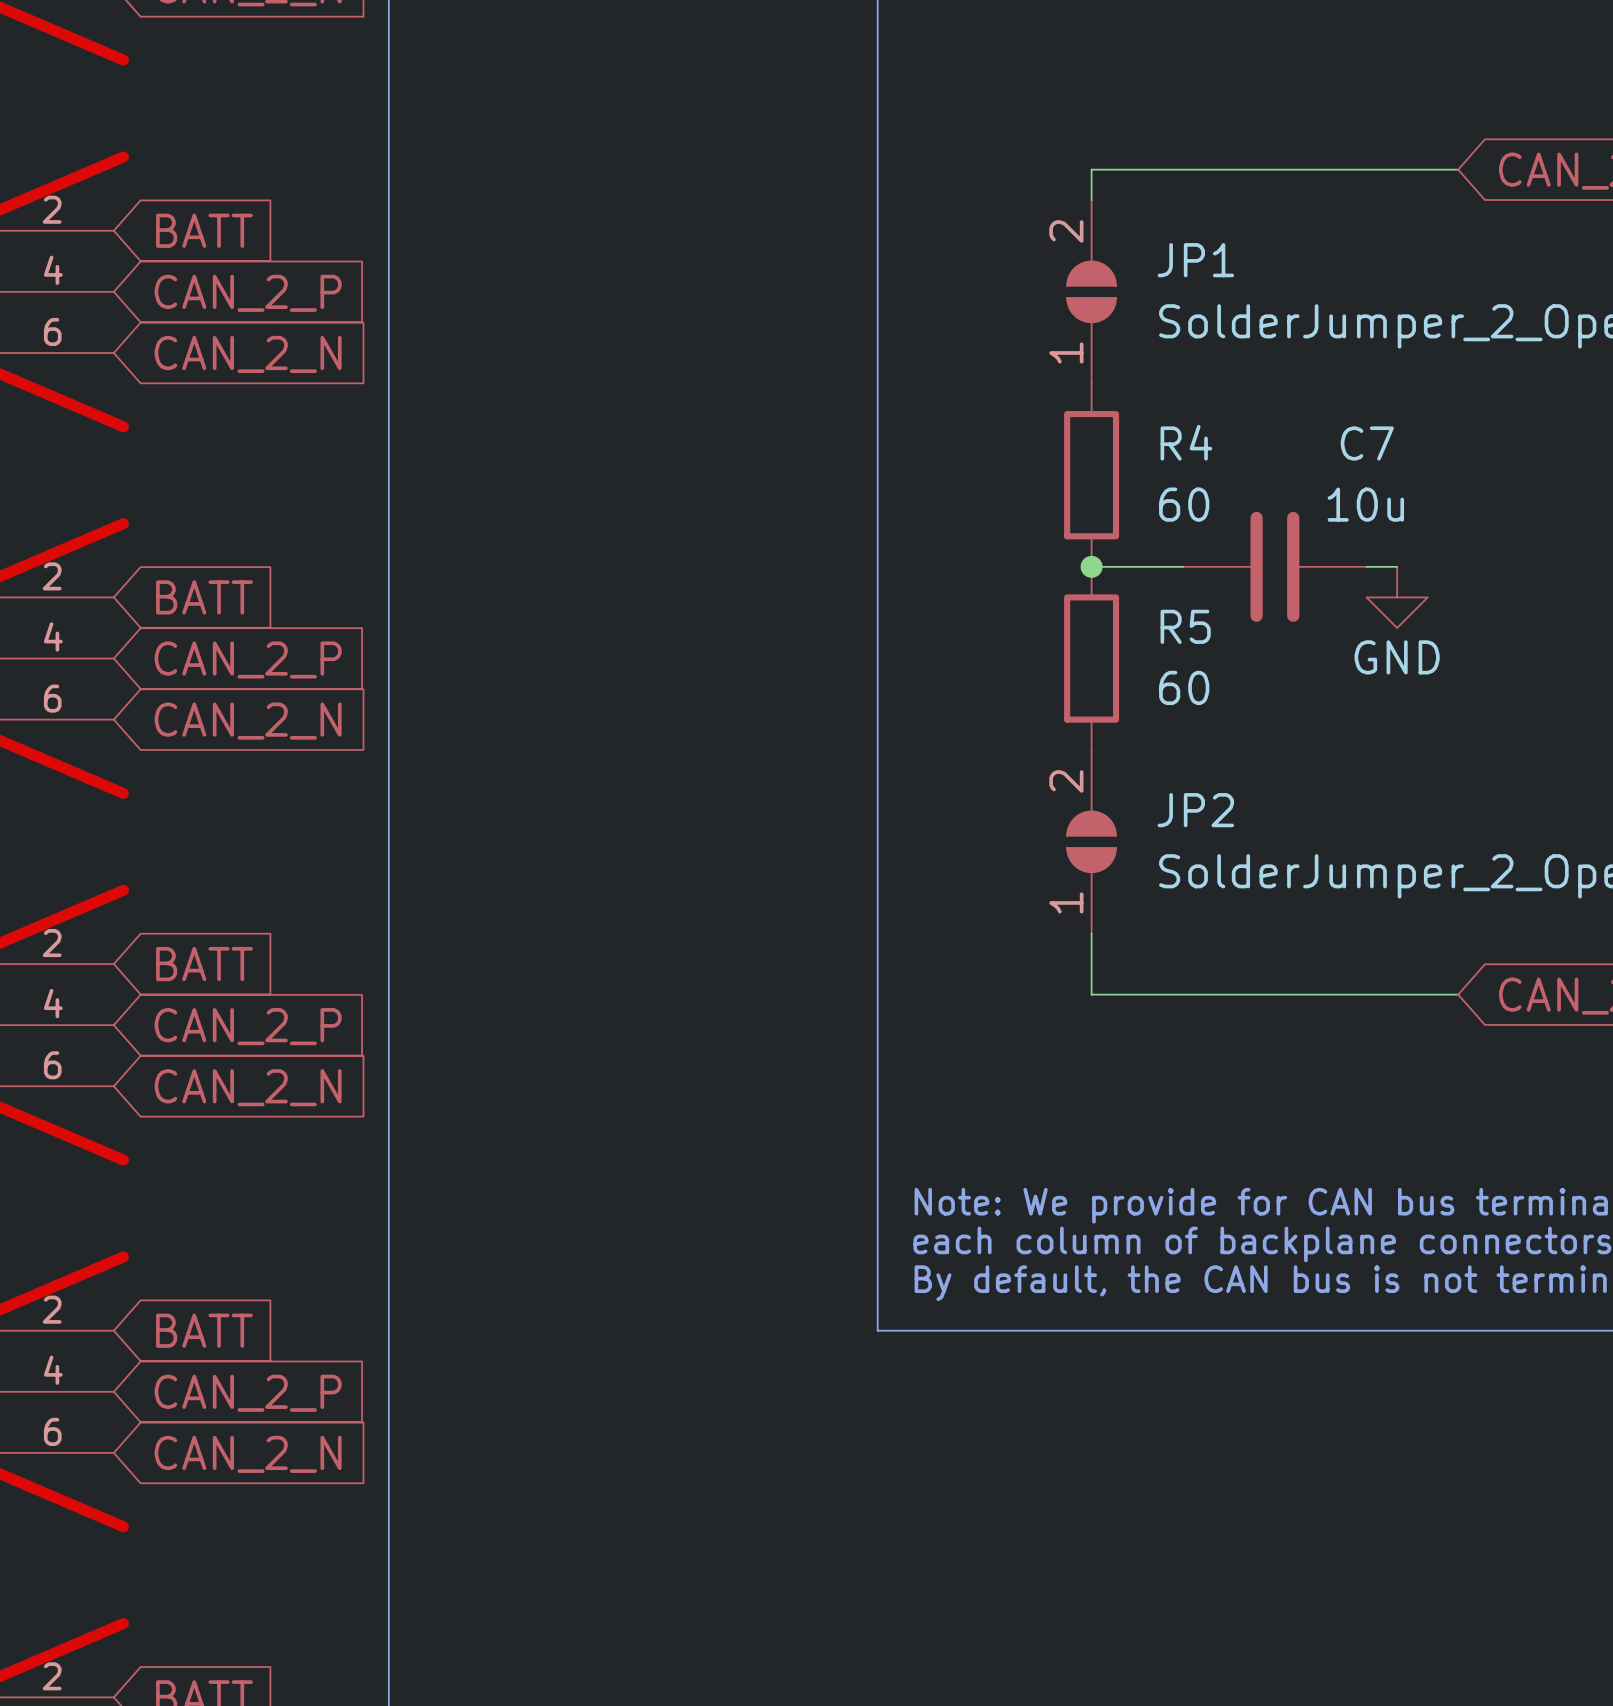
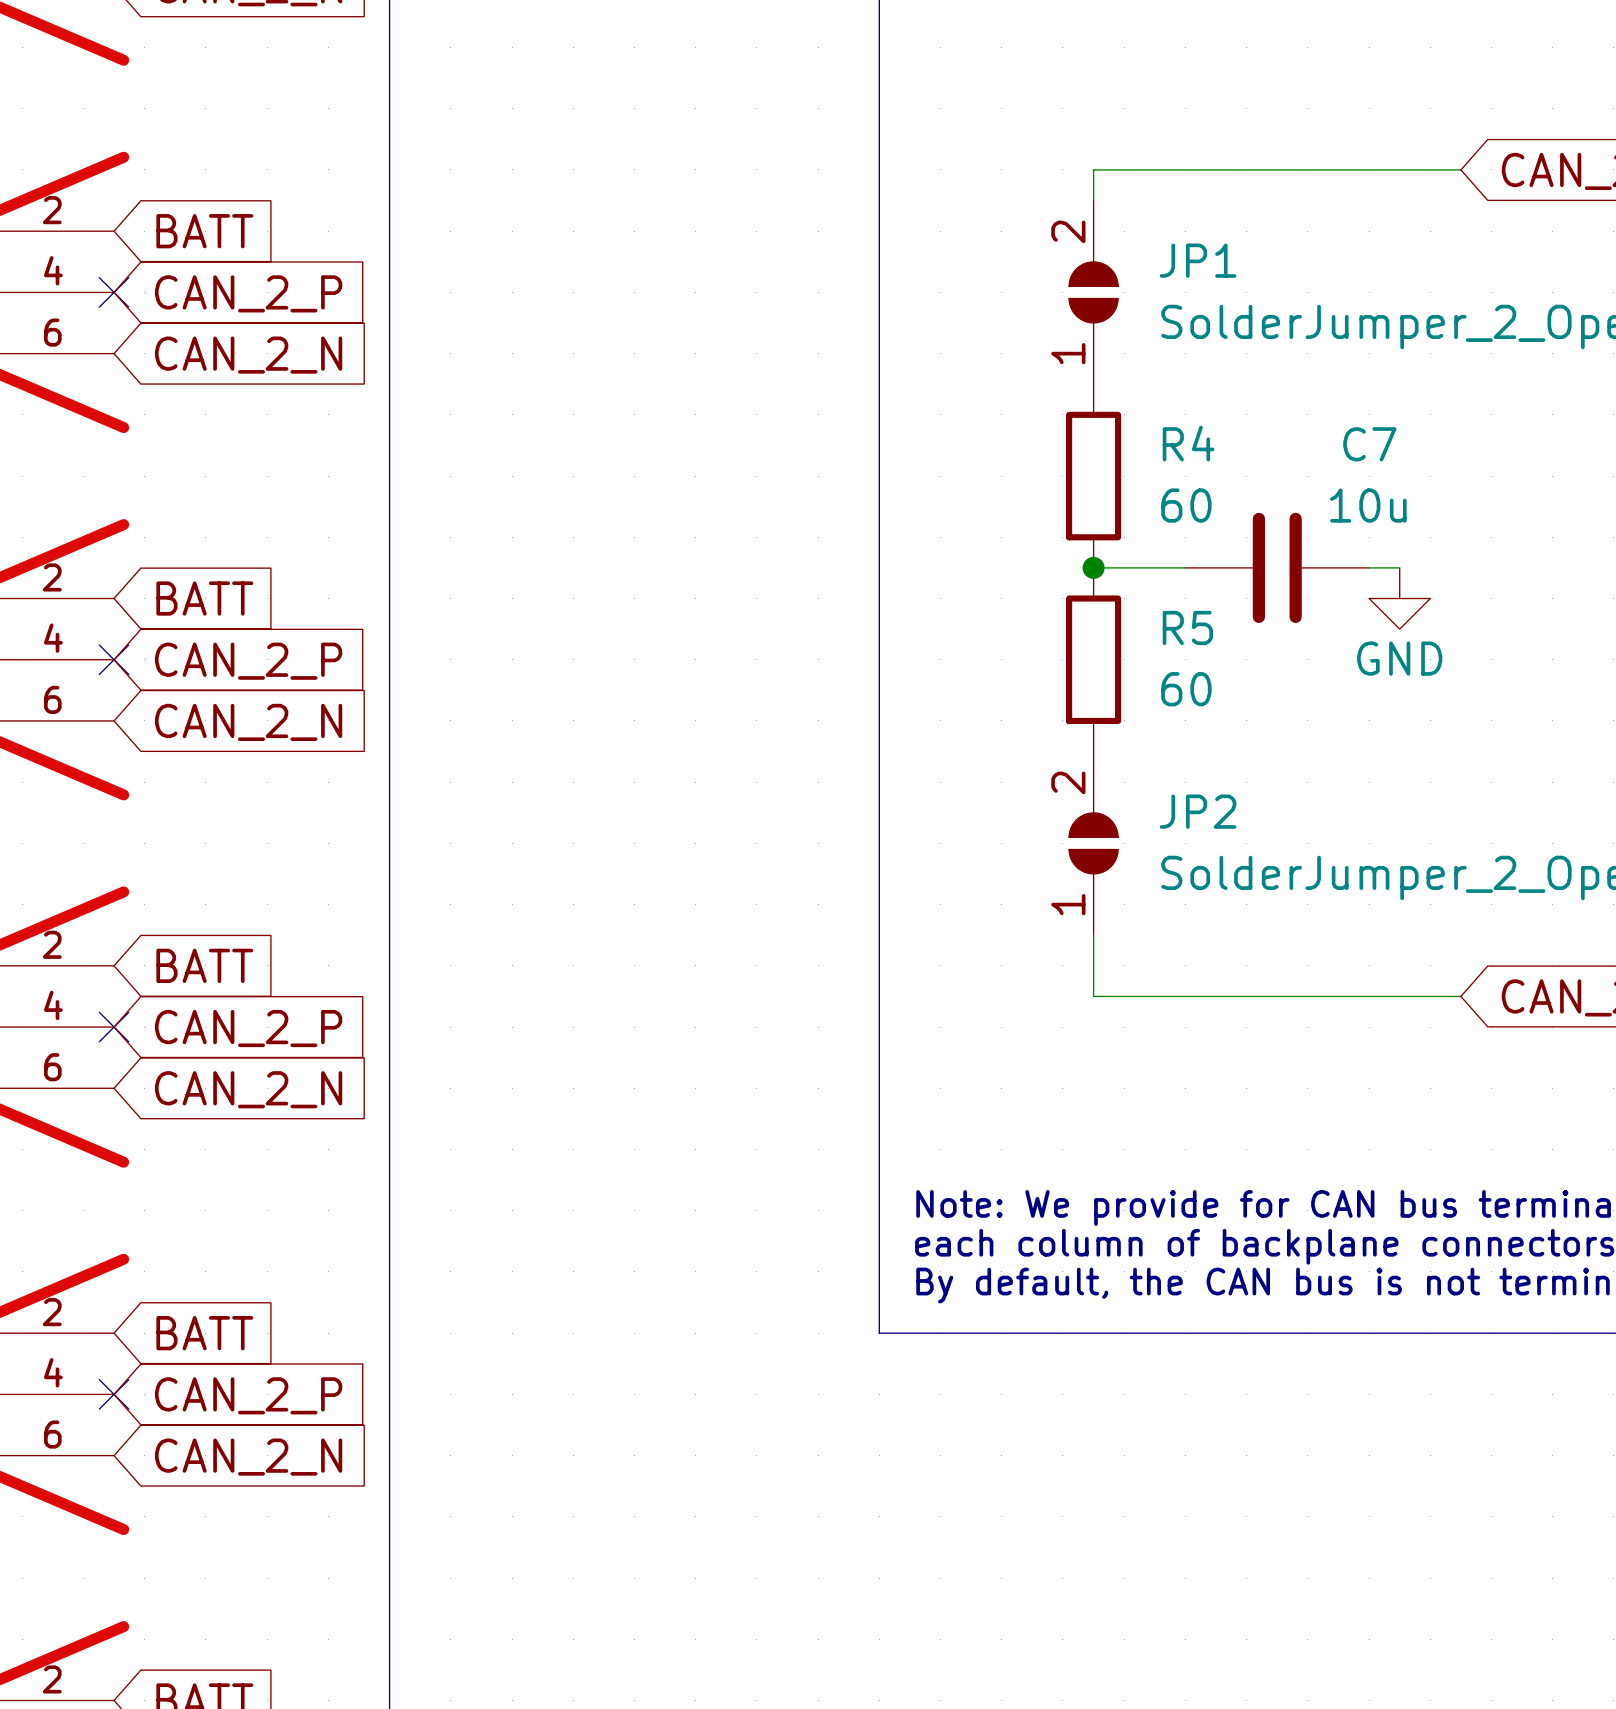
no-connect mark: none -> (114, 292)
no-connect mark: none -> (114, 659)
no-connect mark: none -> (114, 1027)
no-connect mark: none -> (114, 1394)

